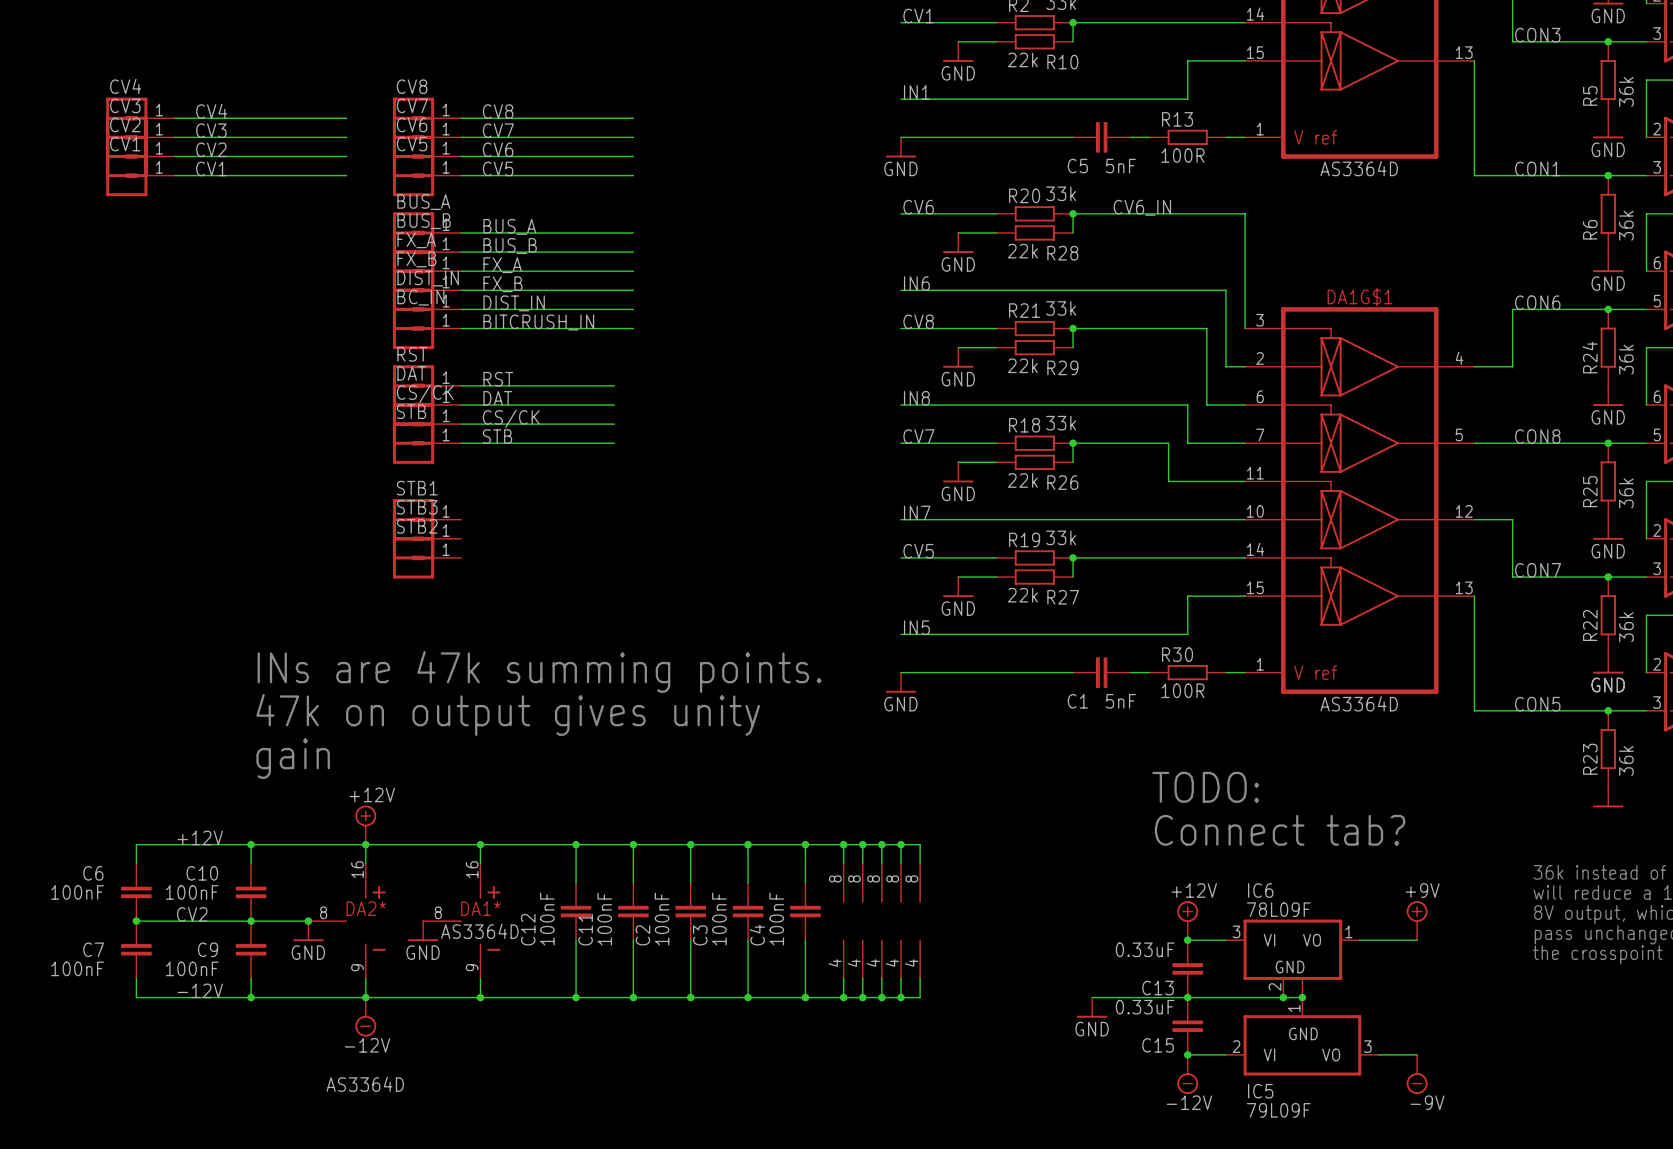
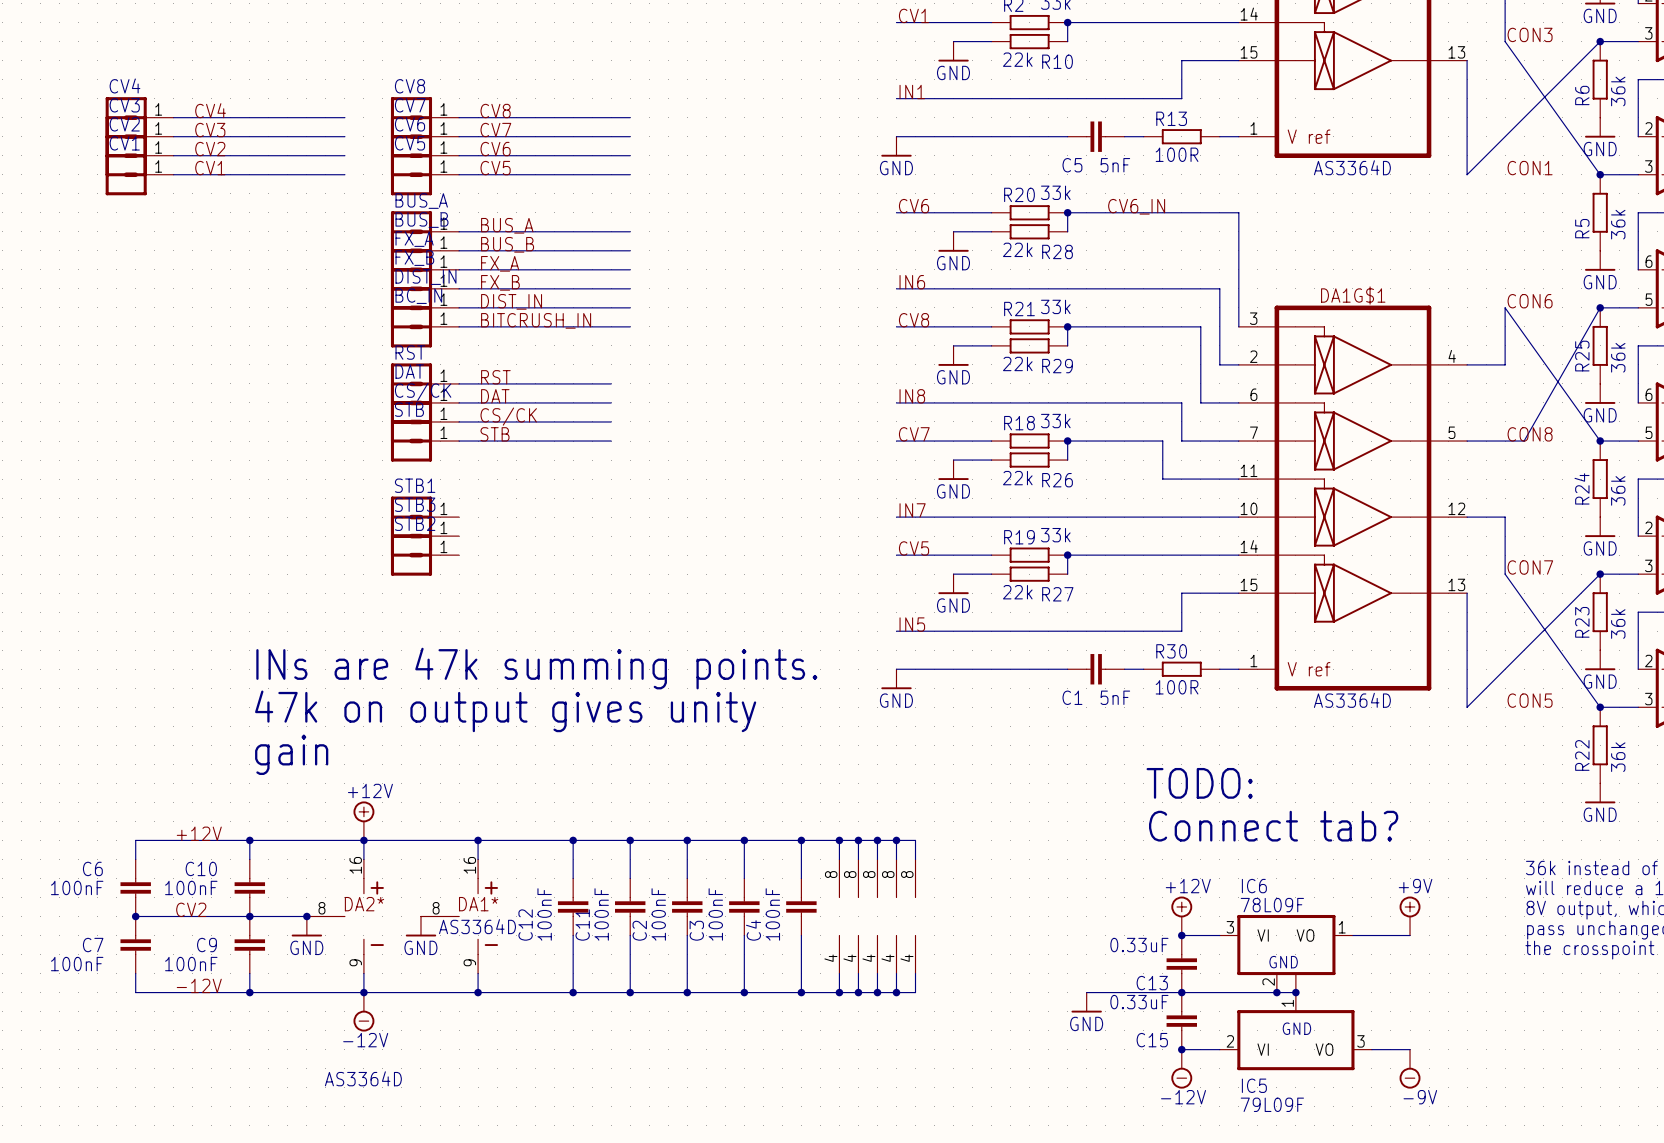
wire: (1512, 41) (1608, 41) -> (1505, 41) (1600, 174)
R5 name: R5 (1590, 95) -> R6 (1582, 95)
wire: (1474, 175) (1608, 175) -> (1467, 174) (1600, 41)
R6 name: R6 (1590, 229) -> R5 (1582, 228)
wire: (1512, 309) (1608, 309) -> (1505, 307) (1600, 441)
R24 name: R24 (1589, 357) -> R25 (1582, 356)
wire: (1531, 443) (1608, 443) -> (1524, 441) (1600, 307)
R25 name: R25 (1590, 491) -> R24 (1582, 488)
wire: (1512, 577) (1608, 577) -> (1505, 574) (1600, 707)
R22 name: R22 (1590, 625) -> R23 (1582, 622)
power symbol text position: GND (1608, 685) -> GND (1600, 814)
wire: (1474, 710) (1608, 710) -> (1467, 707) (1600, 574)
R23 name: R23 (1590, 759) -> R22 (1582, 755)

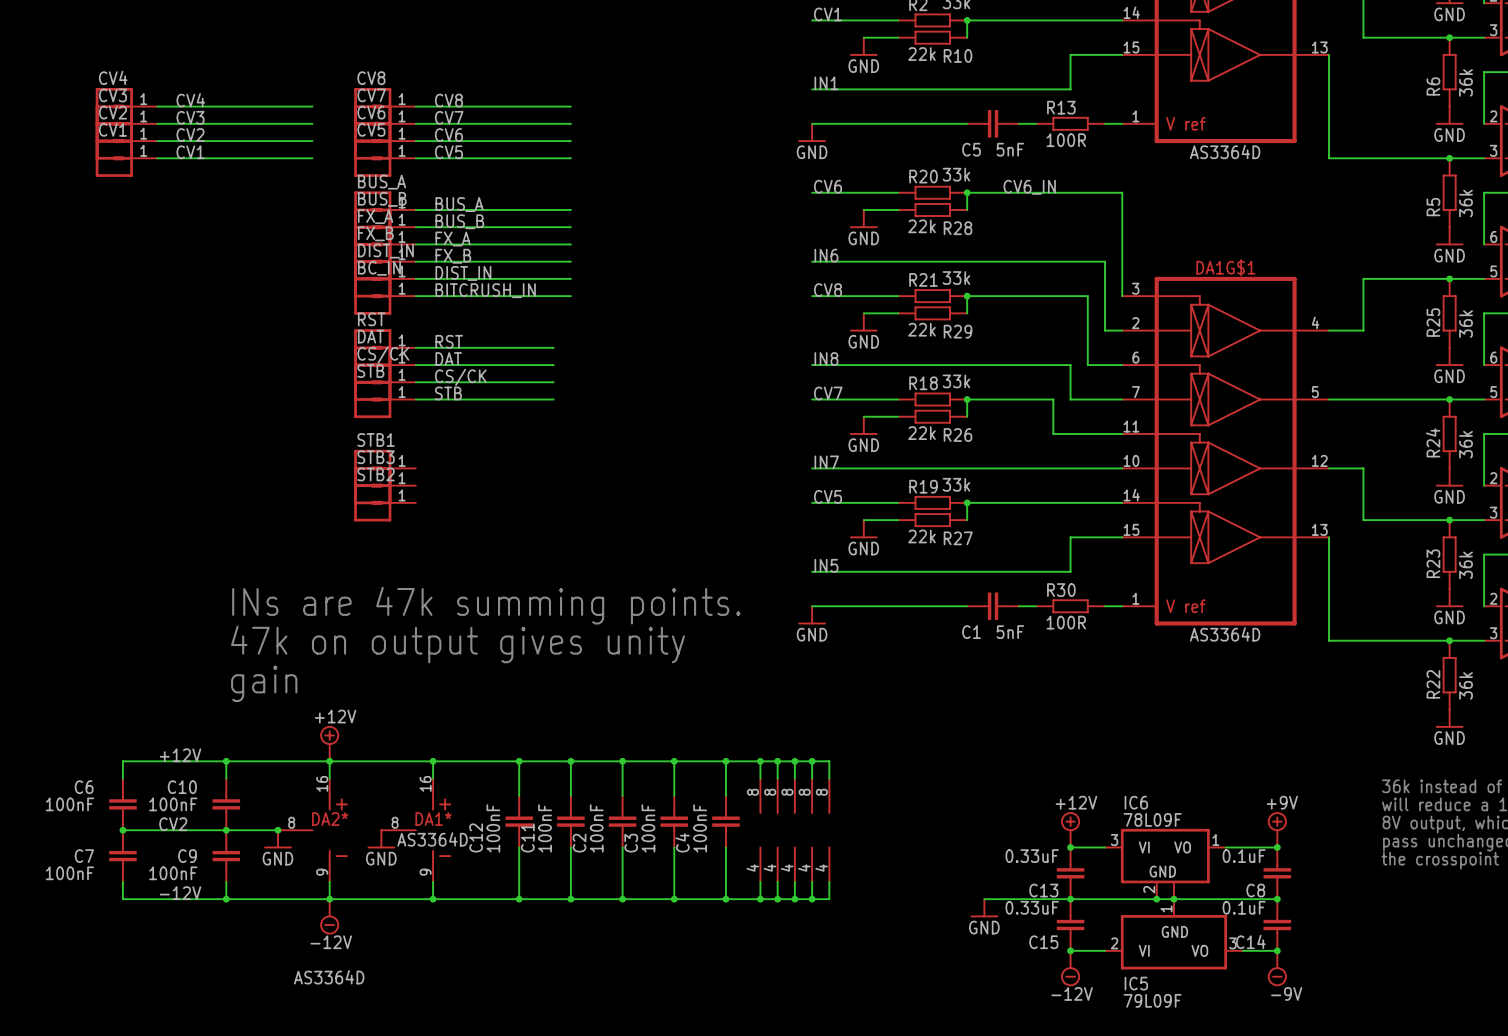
label: CON3 (1530, 34) -> none
wire: (1505, 41) (1600, 174) -> (1363, 37) (1449, 37)
wire: (1600, 41) (1467, 174) -> (1449, 158) (1329, 158)
label: CON1 (1530, 168) -> none
label: CON6 (1530, 301) -> none
wire: (1505, 307) (1600, 441) -> (1363, 278) (1449, 278)
wire: (1600, 307) (1524, 441) -> (1449, 399) (1380, 399)
label: CON8 (1530, 434) -> none
label: CON7 (1530, 567) -> none
wire: (1505, 574) (1600, 707) -> (1363, 520) (1449, 520)
wire: (1600, 574) (1467, 707) -> (1449, 640) (1329, 640)
label: CON5 (1530, 700) -> none
text: TODO: (1199, 783) -> none
text: Connect tab? (1273, 826) -> none
junction: none -> (1277, 847)
C8: none -> 0.1uF (1277, 873)
wire: none -> (1173, 899) (1277, 899)
junction: none -> (1277, 899)
C14: none -> 0.1uF (1277, 925)
junction: none -> (1277, 950)

